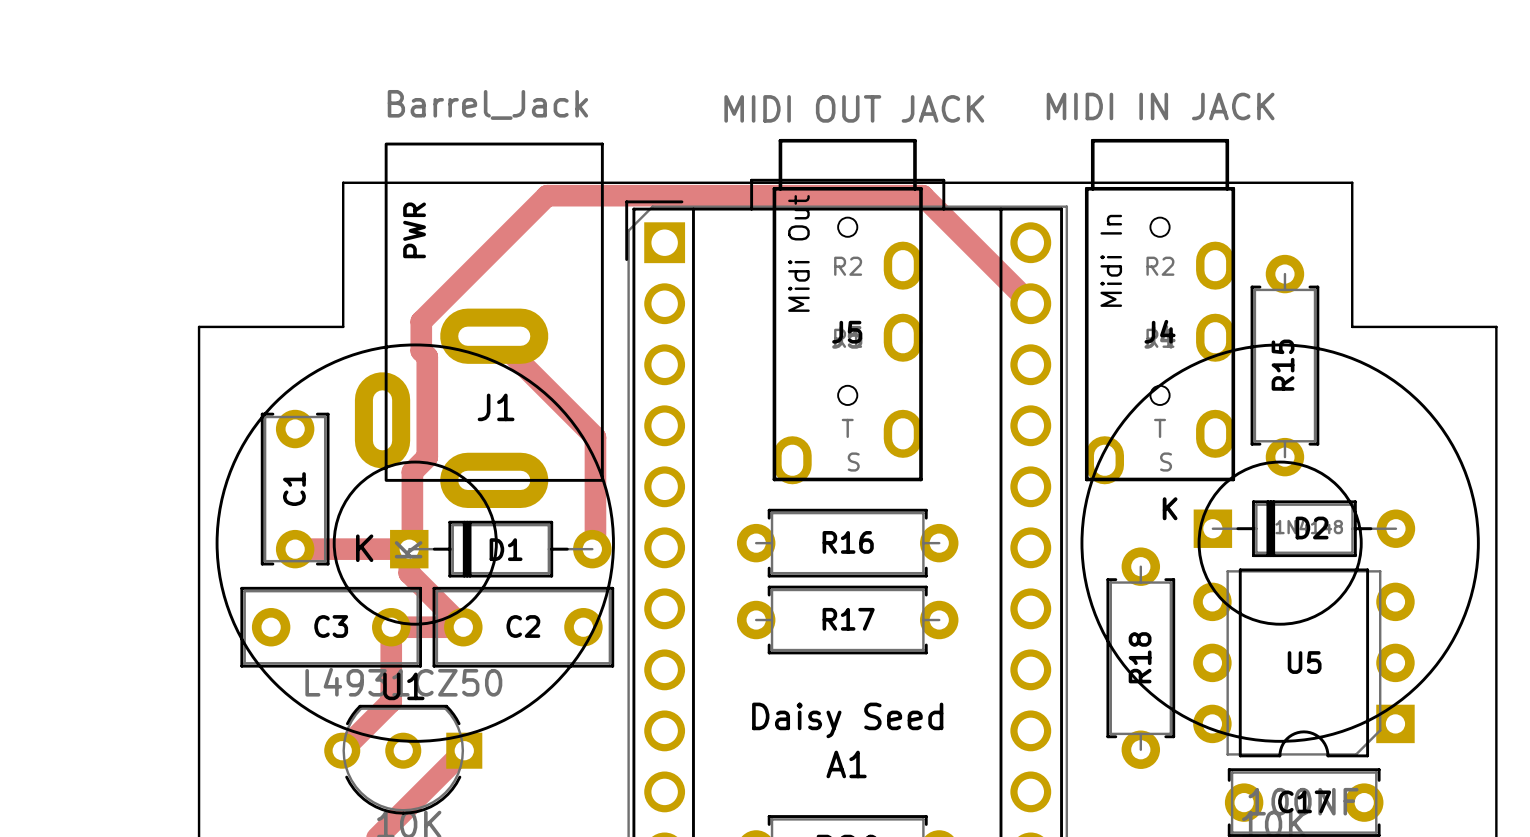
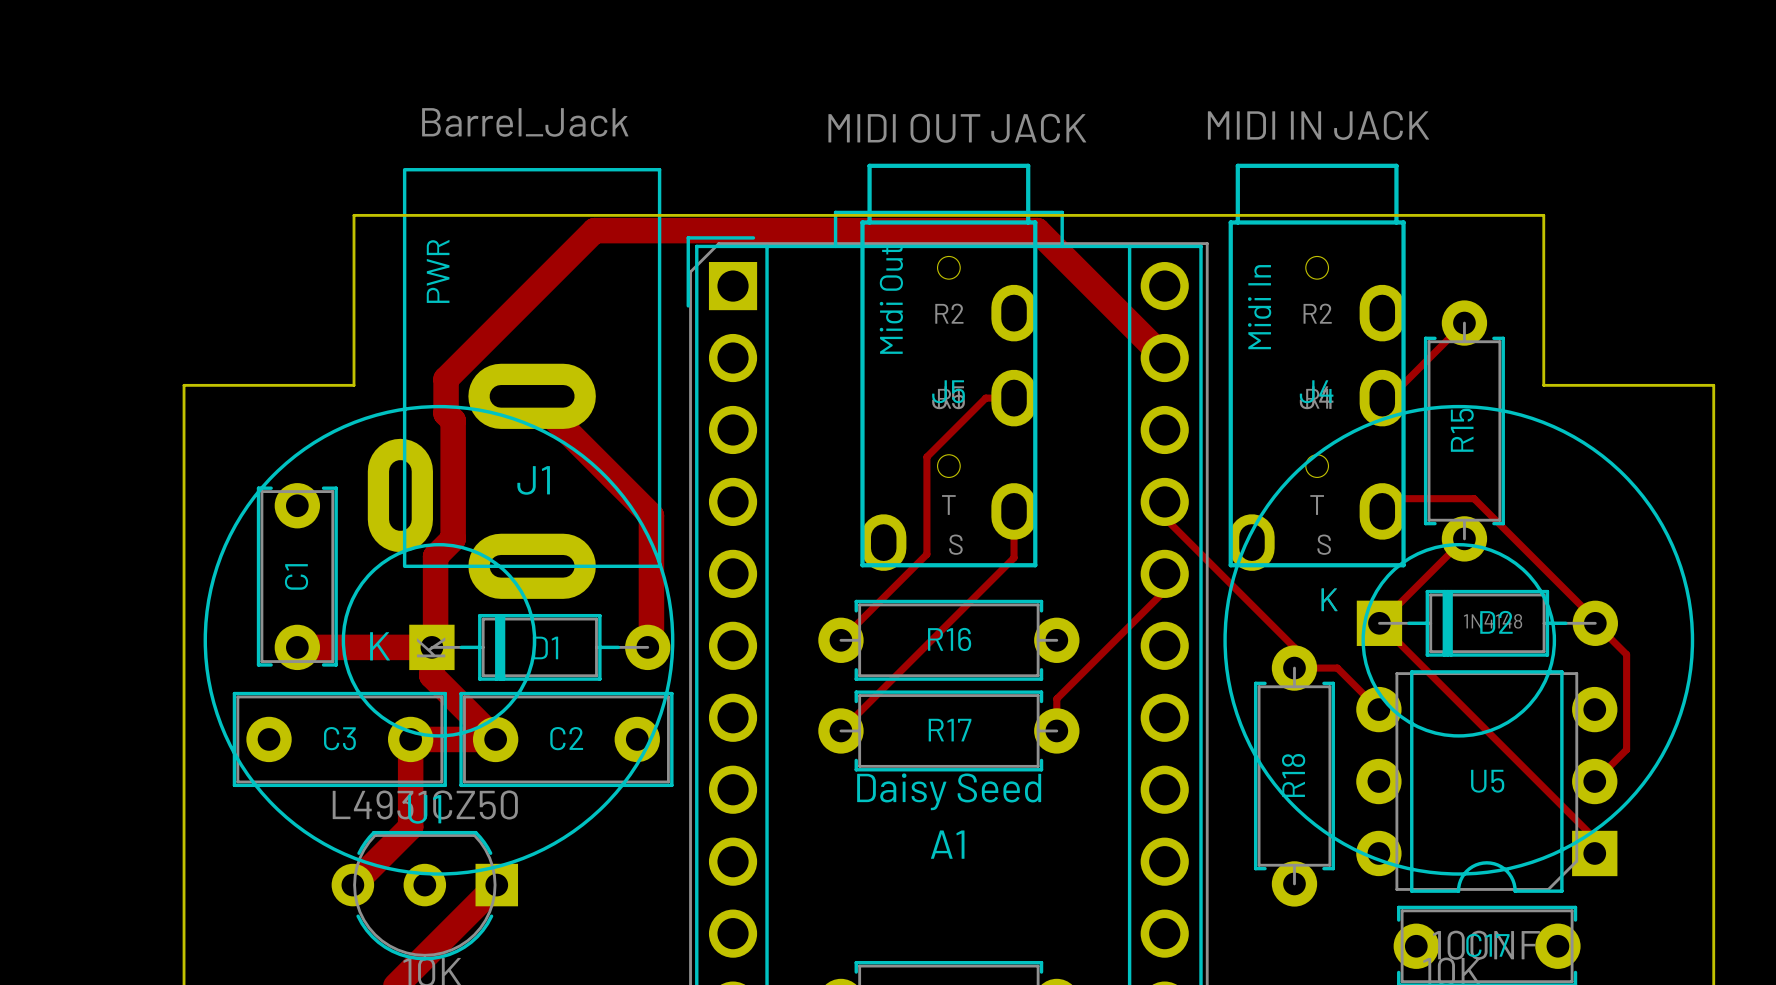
track: none -> (1464, 323) (1389, 398) (1382, 398)
track: none -> (1014, 398) (985, 398) (926, 457) (926, 554) (840, 640)
track: none -> (1164, 501) (1164, 517) (1294, 647) (1294, 668) (1337, 668) (1378, 709)
track: none -> (1014, 511) (1014, 557) (840, 730)
track: none -> (1382, 511) (1395, 498) (1474, 498) (1595, 619) (1595, 623) (1626, 654) (1626, 749) (1594, 781)
track: none -> (1464, 538) (1380, 623)
track: none -> (1164, 573) (1164, 590) (1056, 698) (1056, 730)
track: none -> (1379, 623) (1594, 838) (1594, 853)
text position: Daisy Seed (847, 720) -> Daisy Seed (949, 791)
A1 name position: A1 (846, 764) -> A1 (947, 844)

